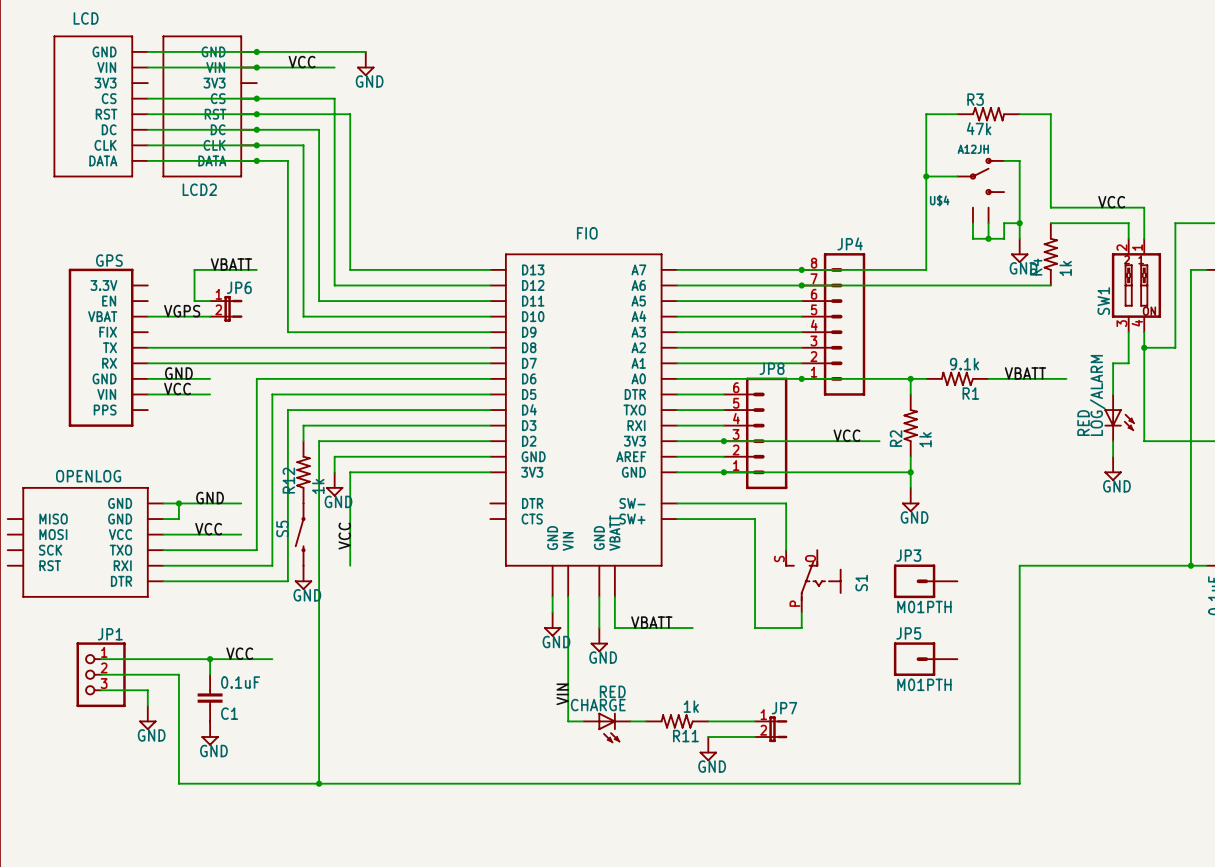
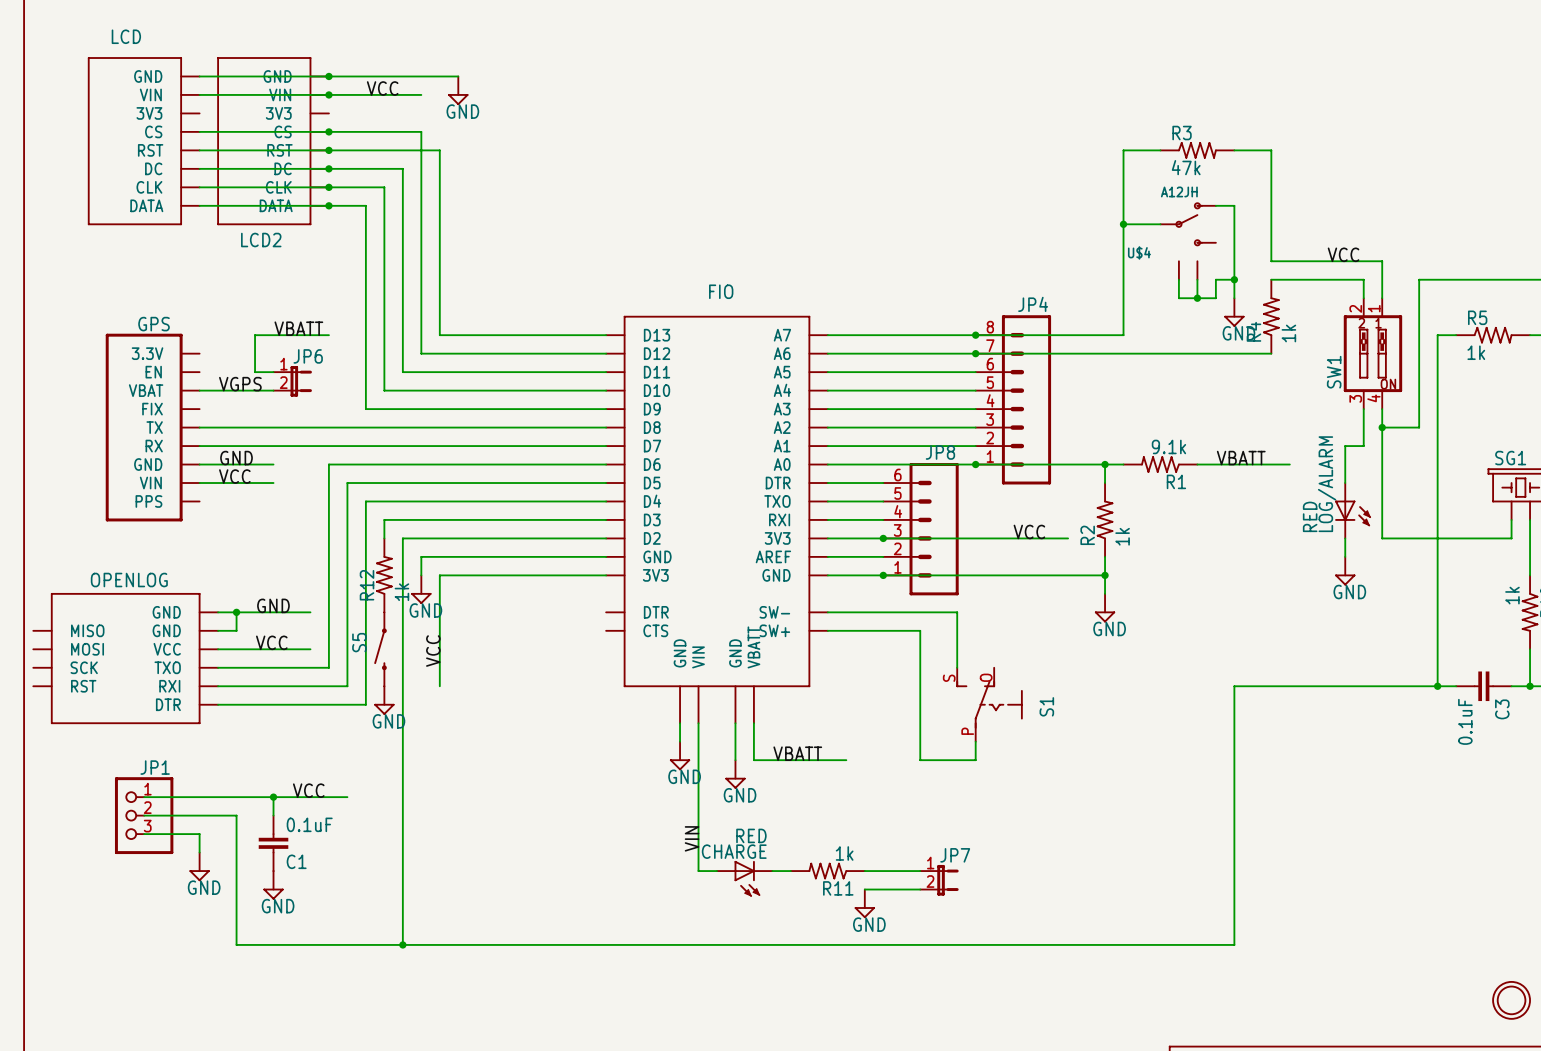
JP3: M01PTH (925, 581) -> none
JP5: M01PTH (925, 659) -> none

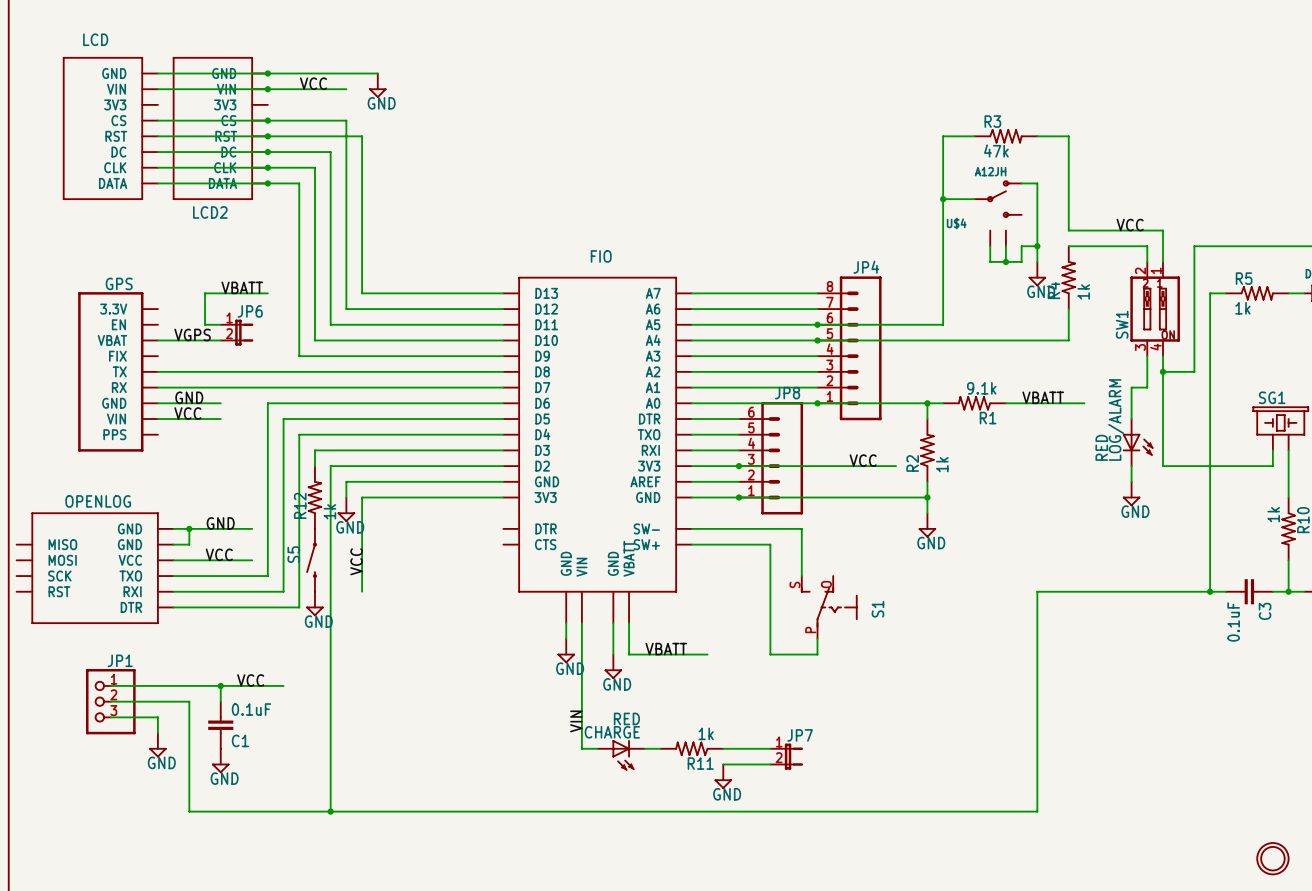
wire: (975, 335) (1123, 335) -> (817, 324) (943, 324) (943, 293)
junction: (975, 335) -> none
wire: (975, 353) (1271, 353) -> (817, 340) (1068, 340) (1068, 309)
junction: (975, 353) -> none
junction: none -> (817, 324)
junction: none -> (817, 340)

